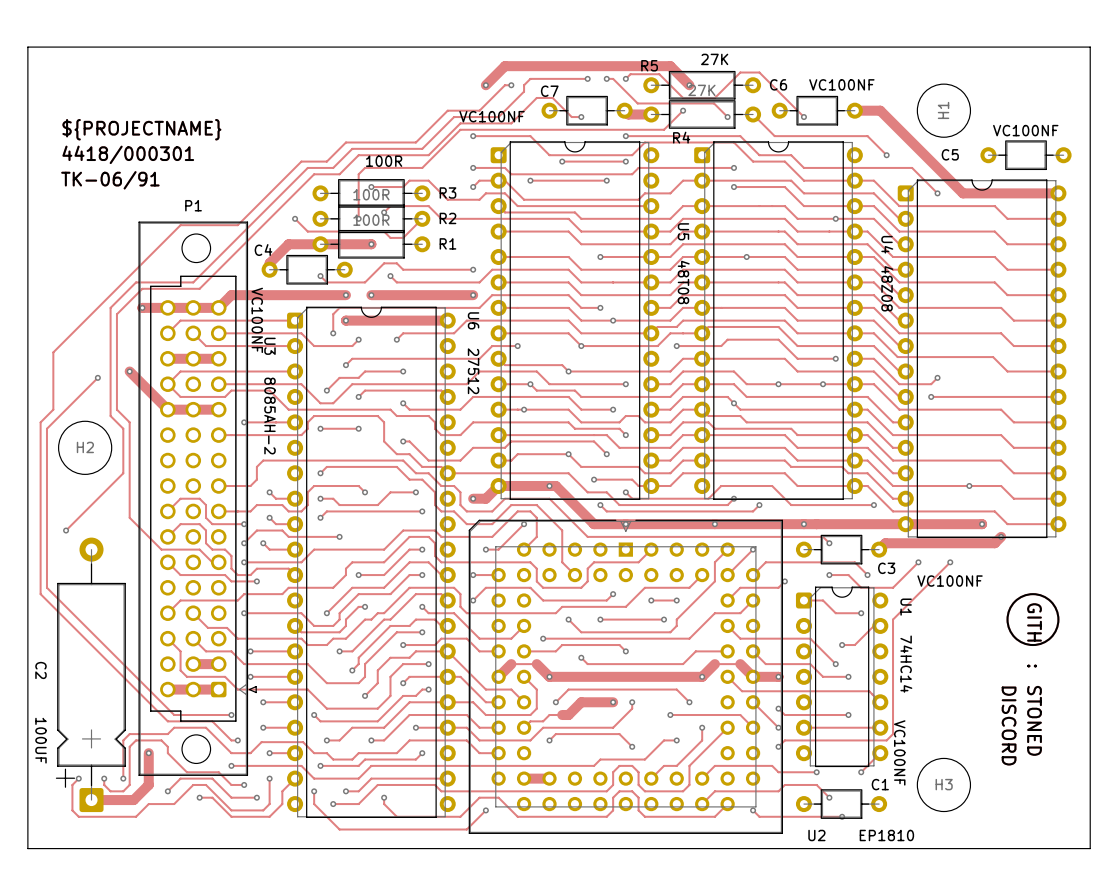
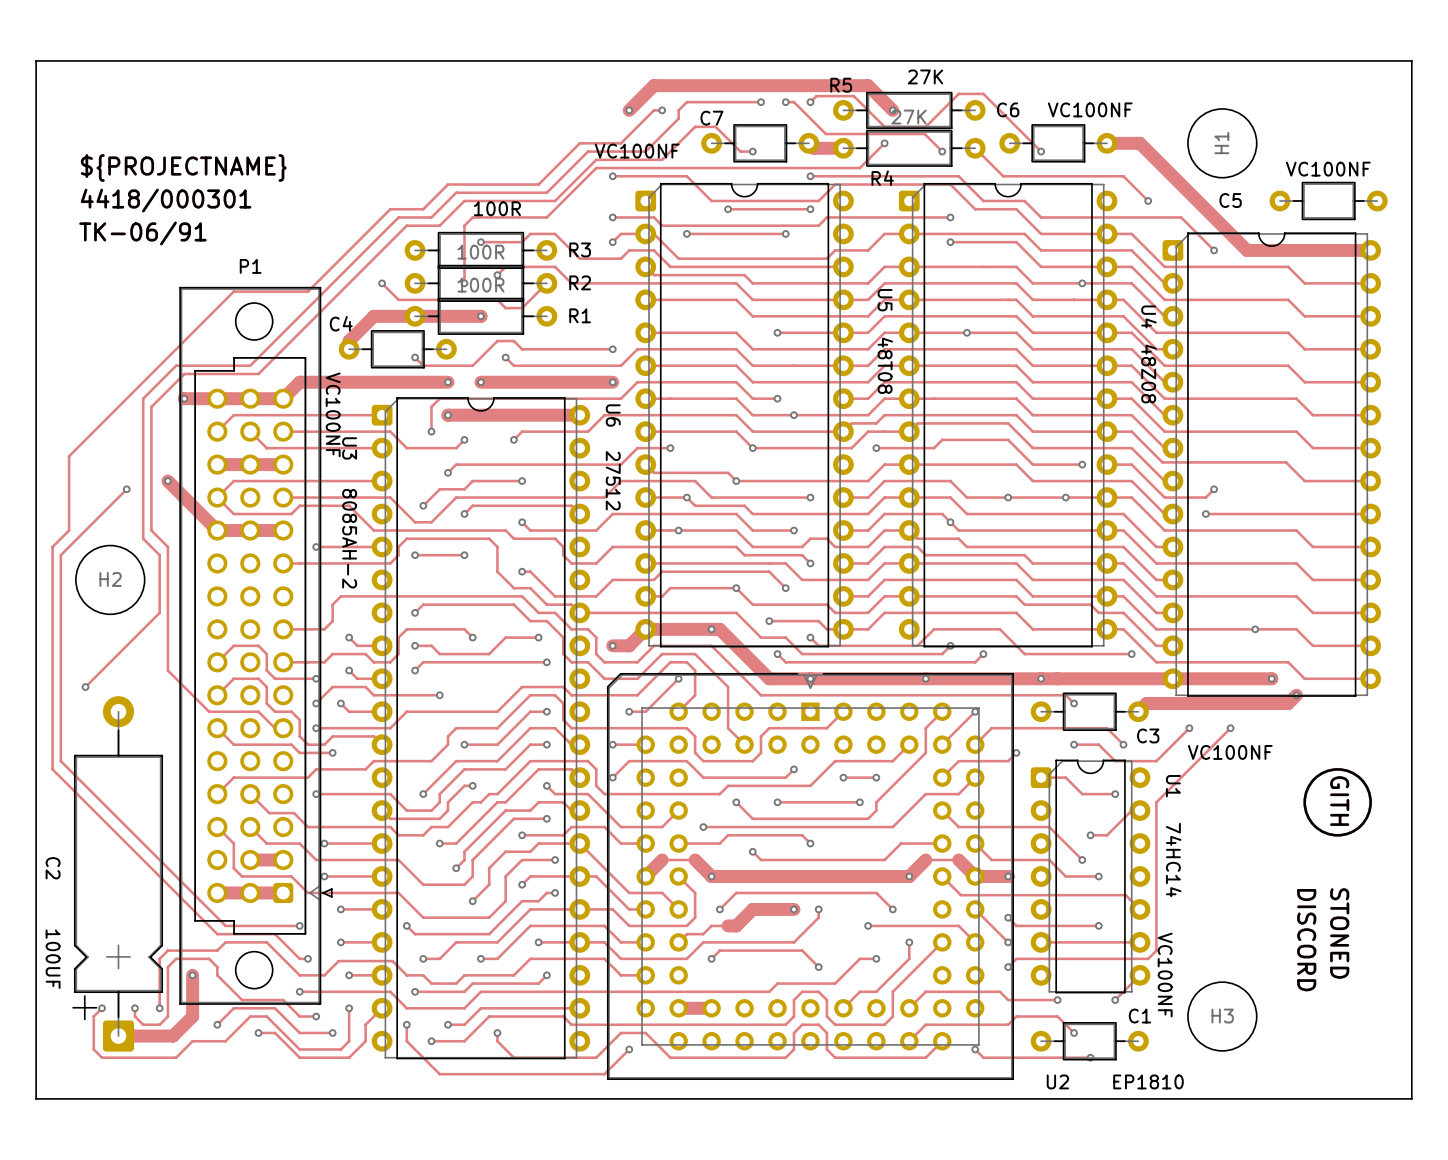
text: none -> GITH (1339, 801)
text: GITH : (1034, 635) -> none

